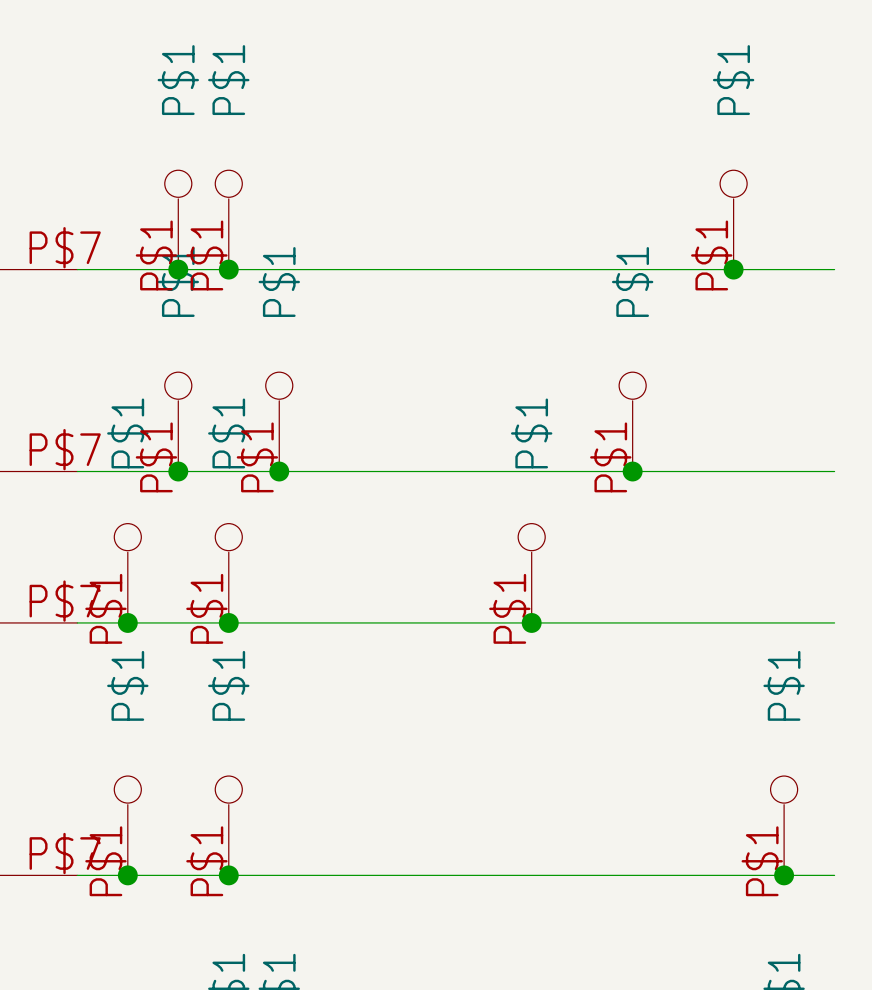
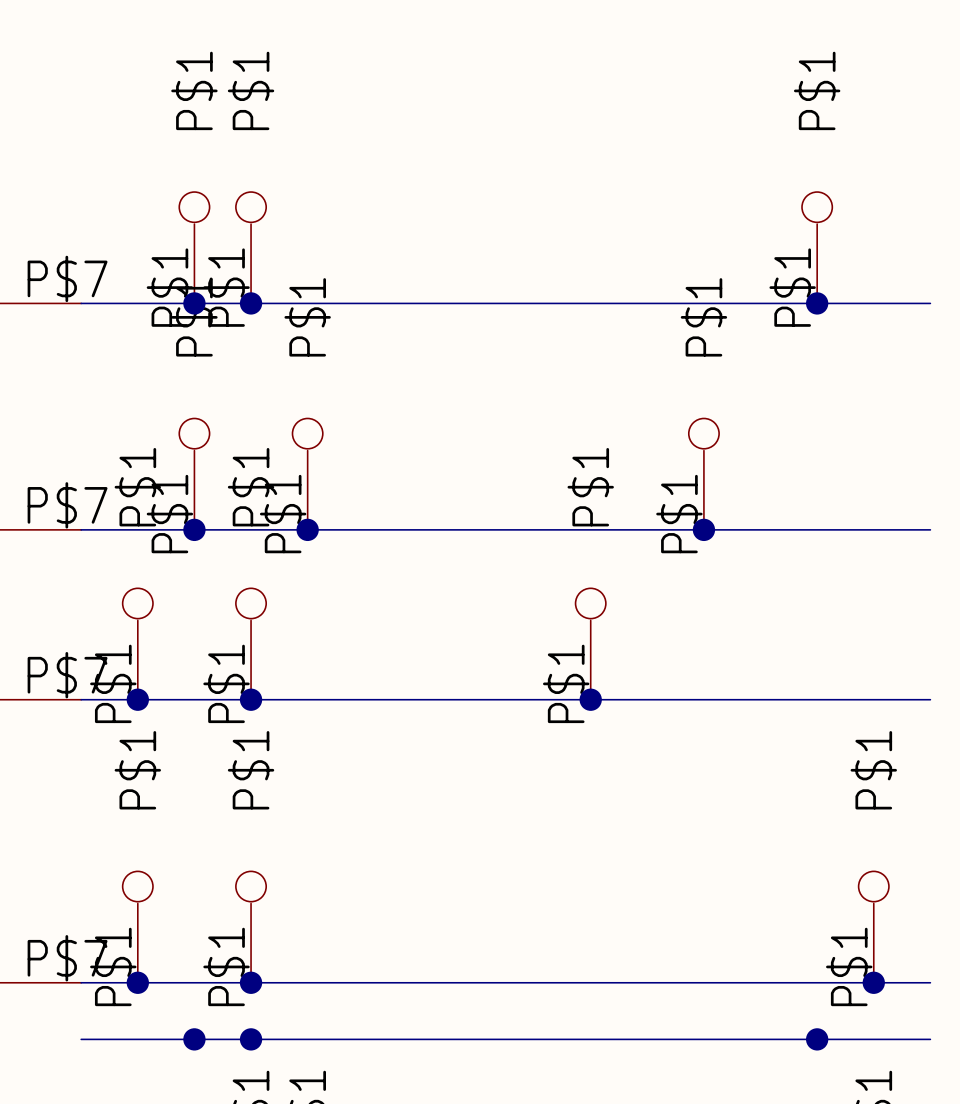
wire: none -> (81, 1039) (930, 1039)
junction: none -> (194, 1039)
junction: none -> (251, 1039)
junction: none -> (817, 1039)

